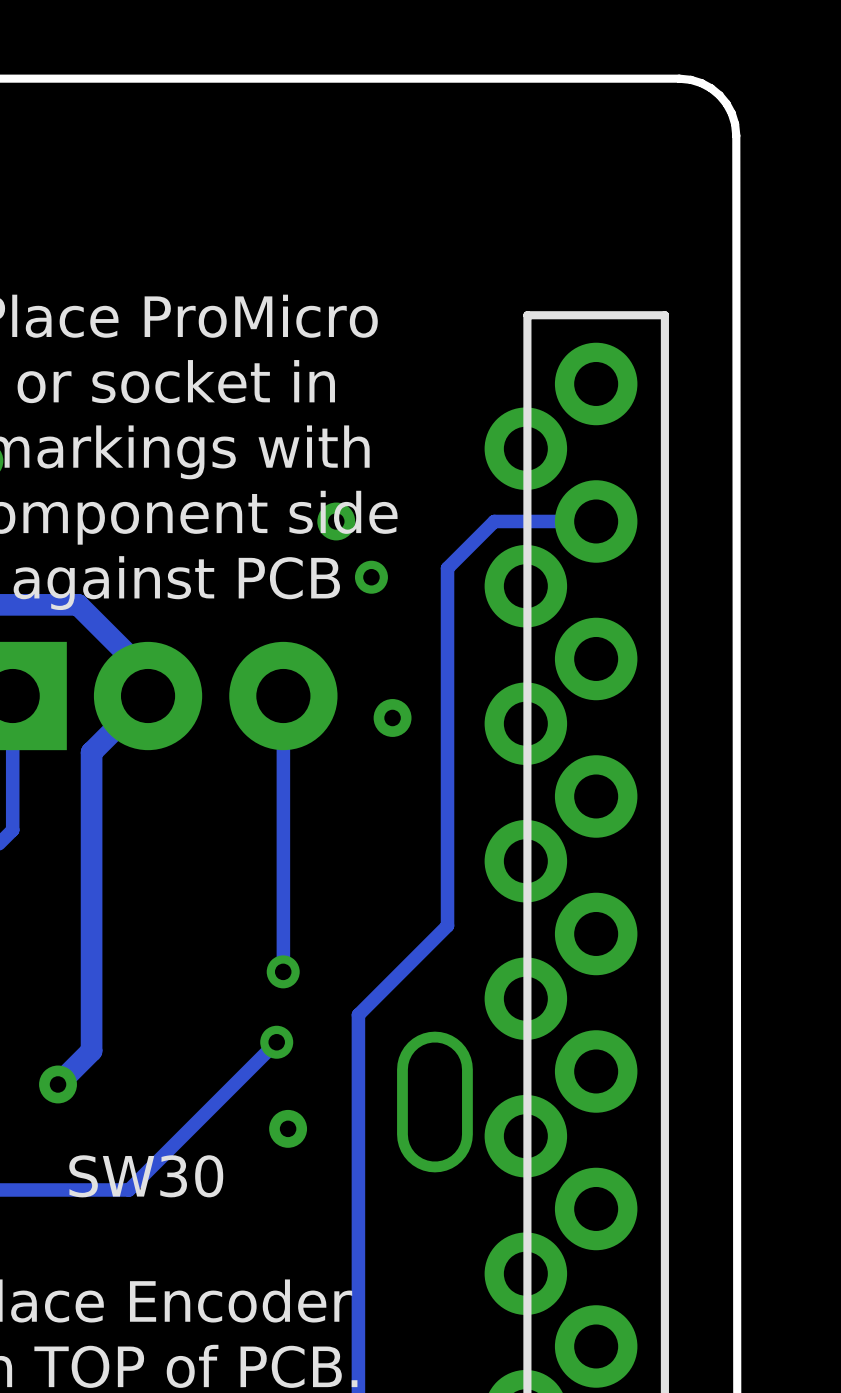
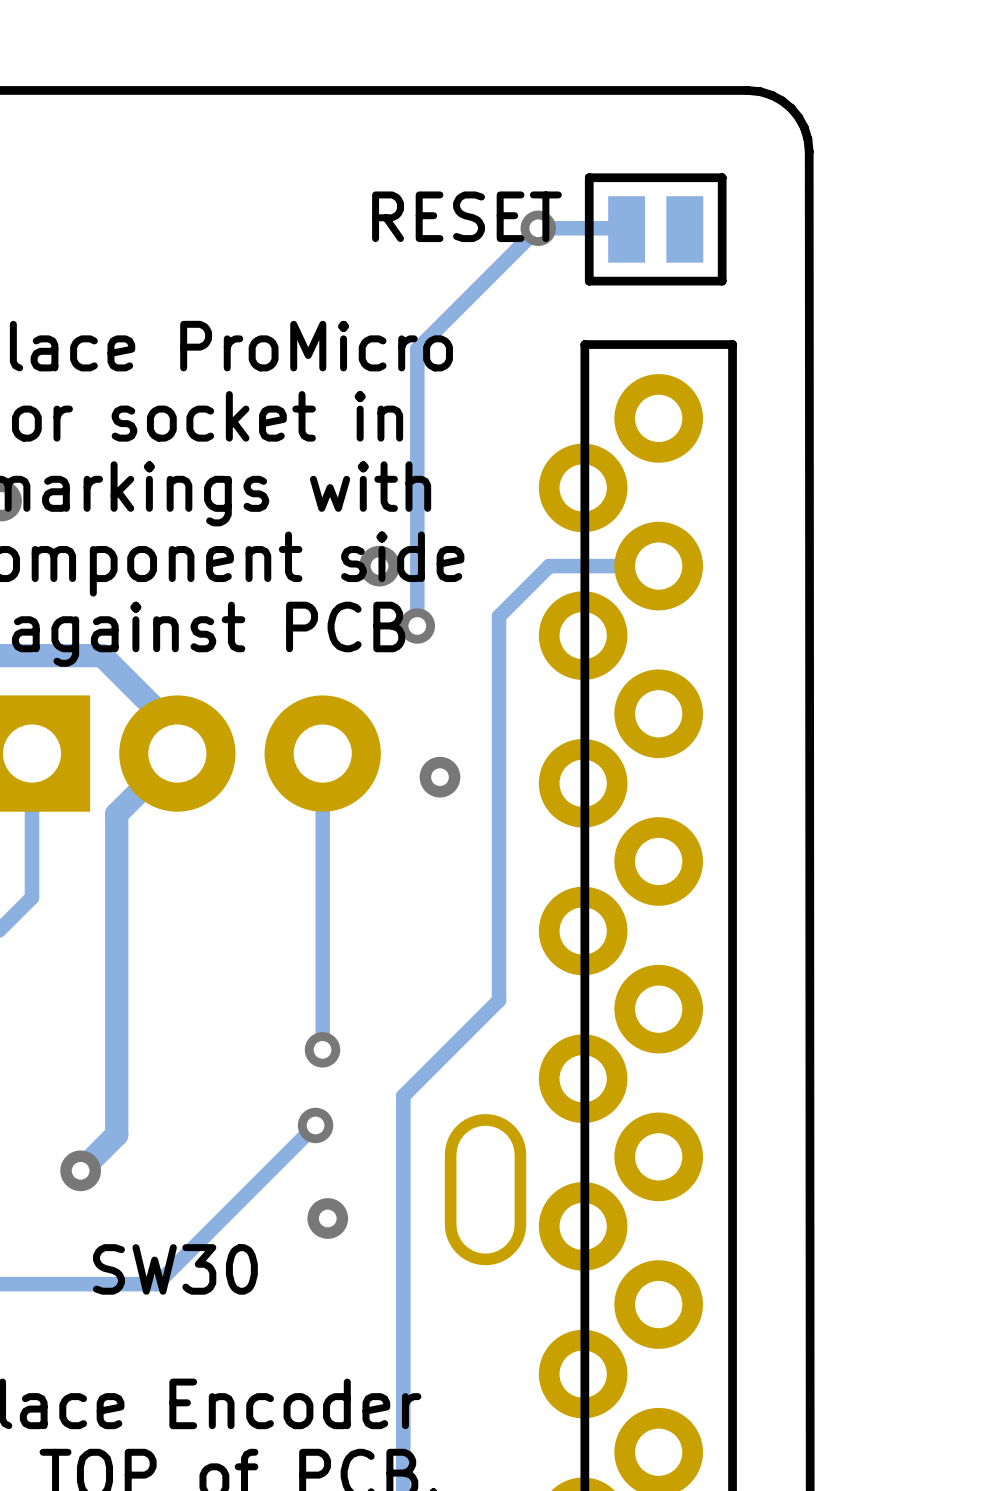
text: none -> RESET (466, 216)
via: none -> (538, 228)
track: none -> (625, 228) (538, 228) (417, 349) (417, 625)
part: none -> (655, 229)

